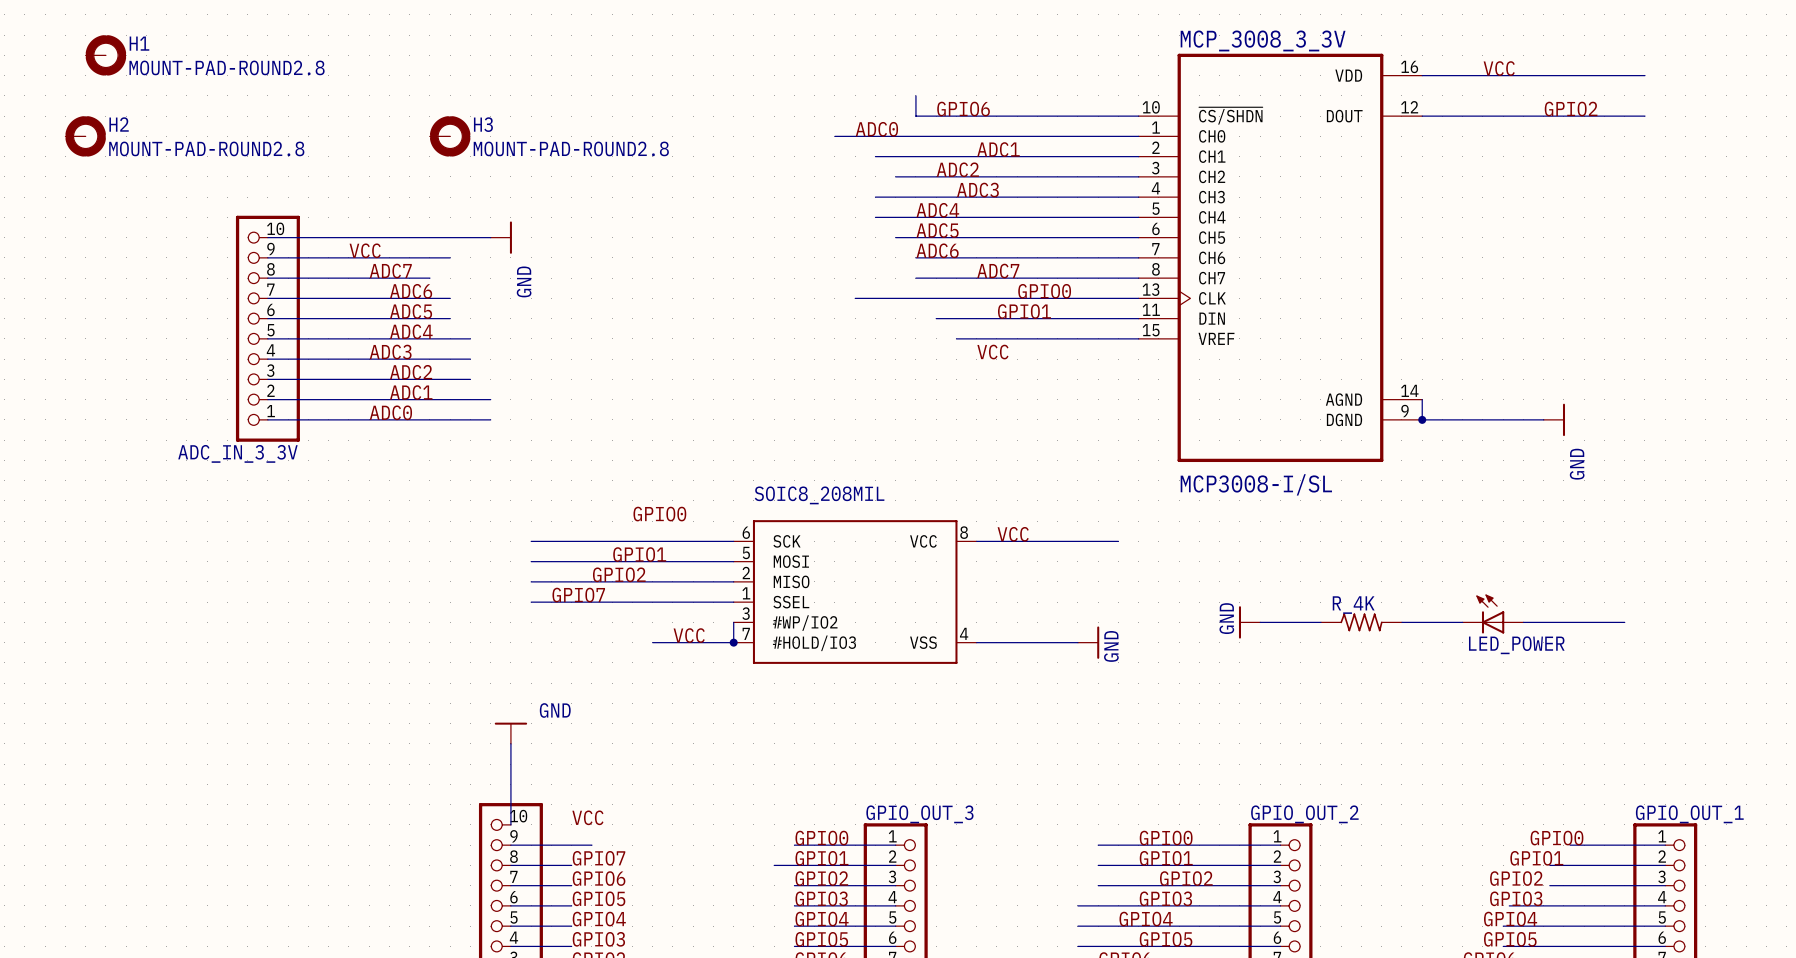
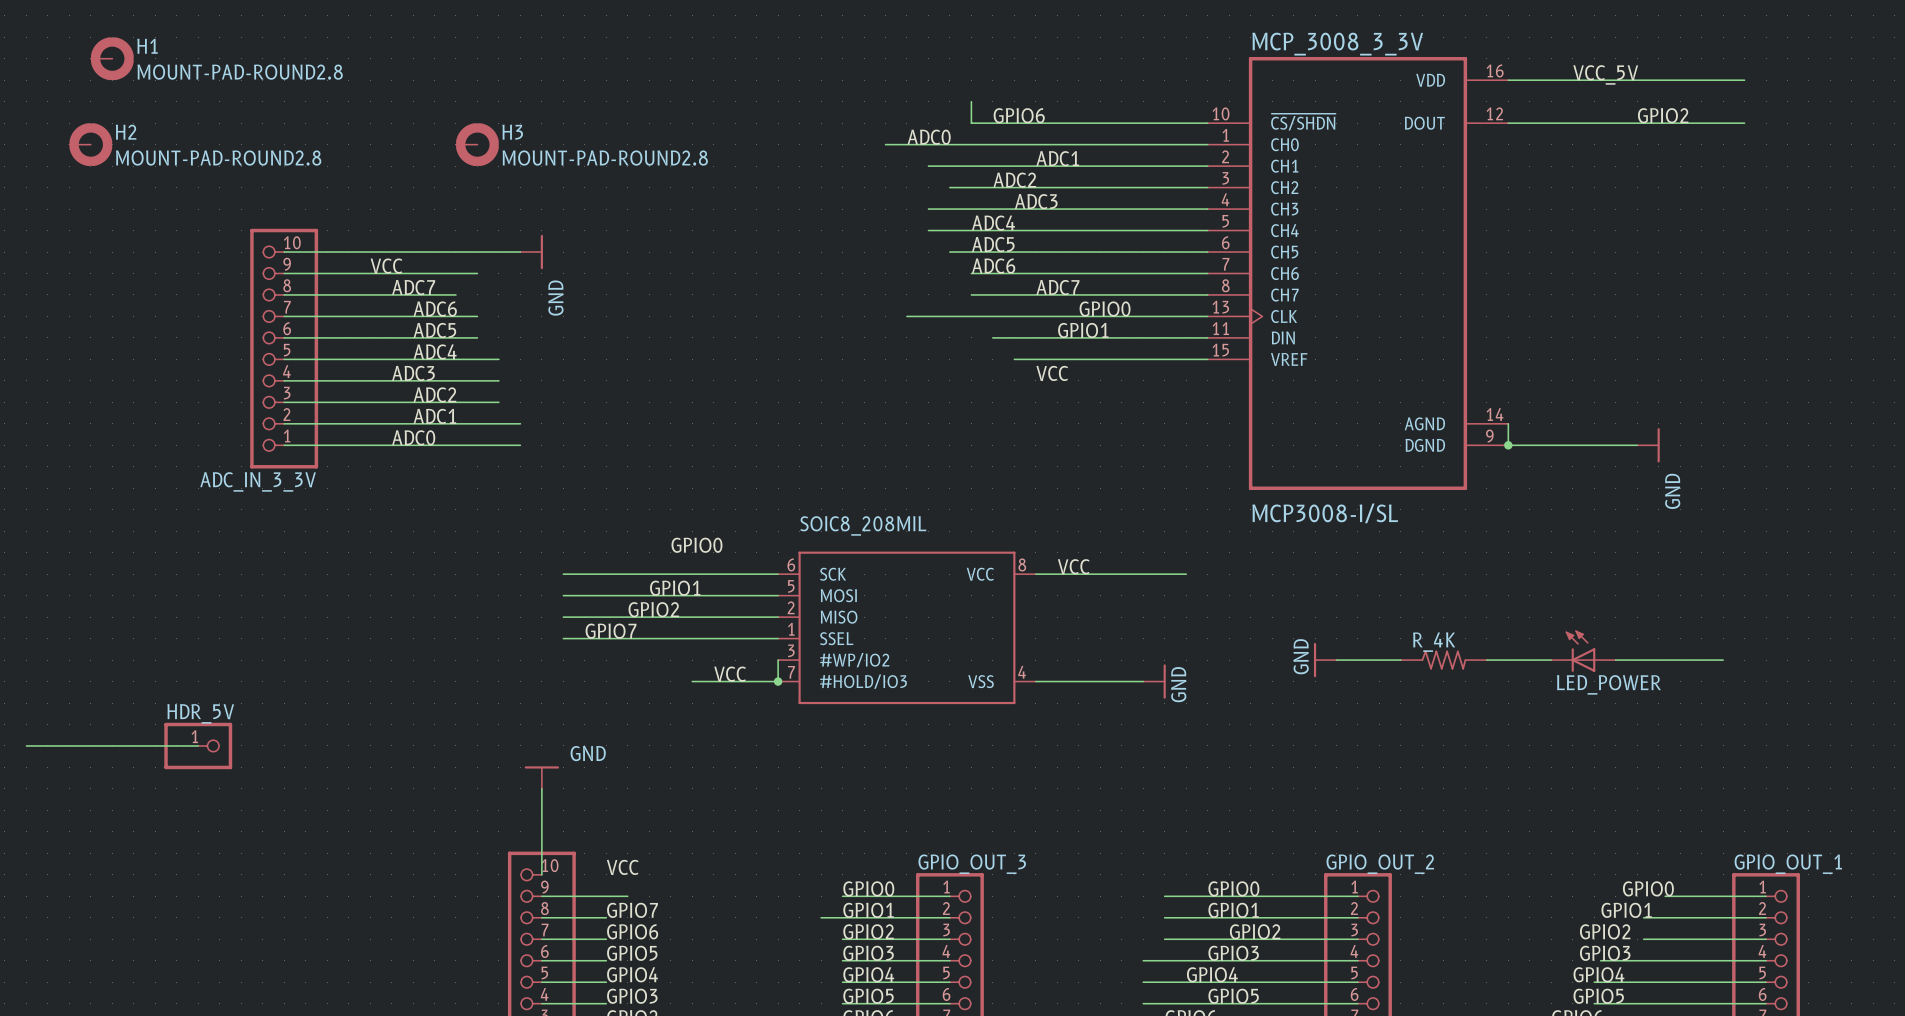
label: VCC (1499, 68) -> VCC_5V (1605, 74)
wire: none -> (26, 745) (198, 745)
HDR_5V: none -> (198, 745)

